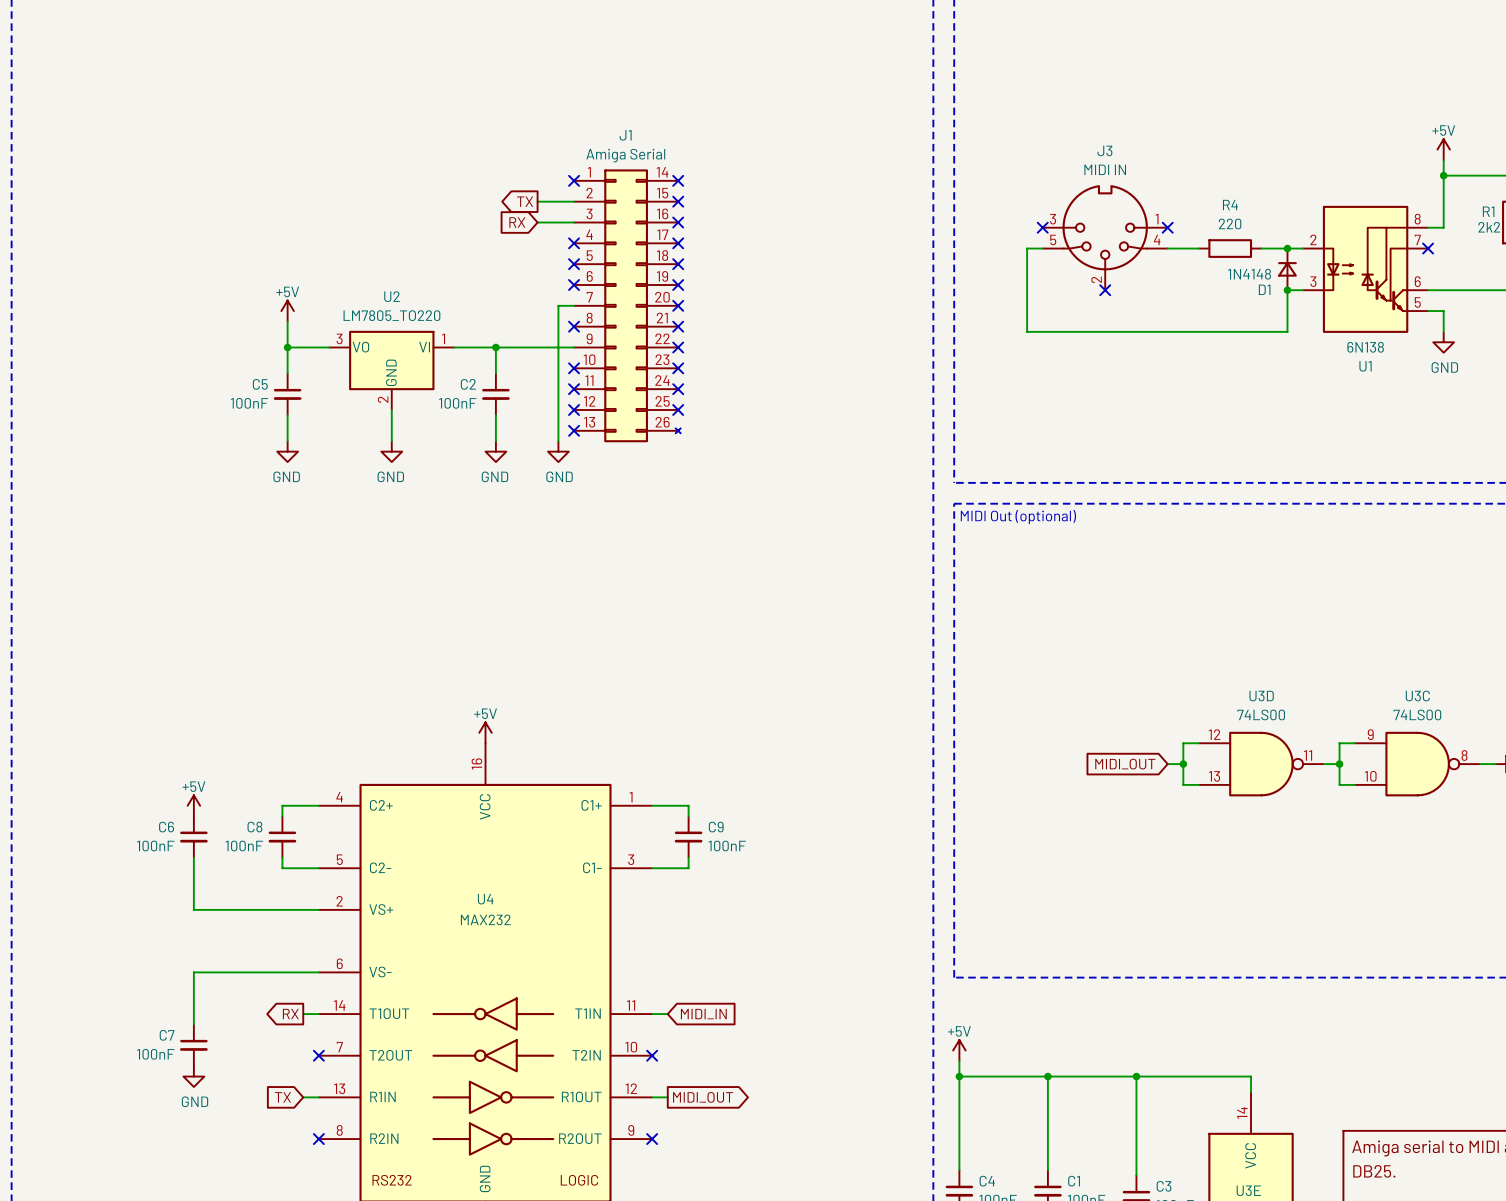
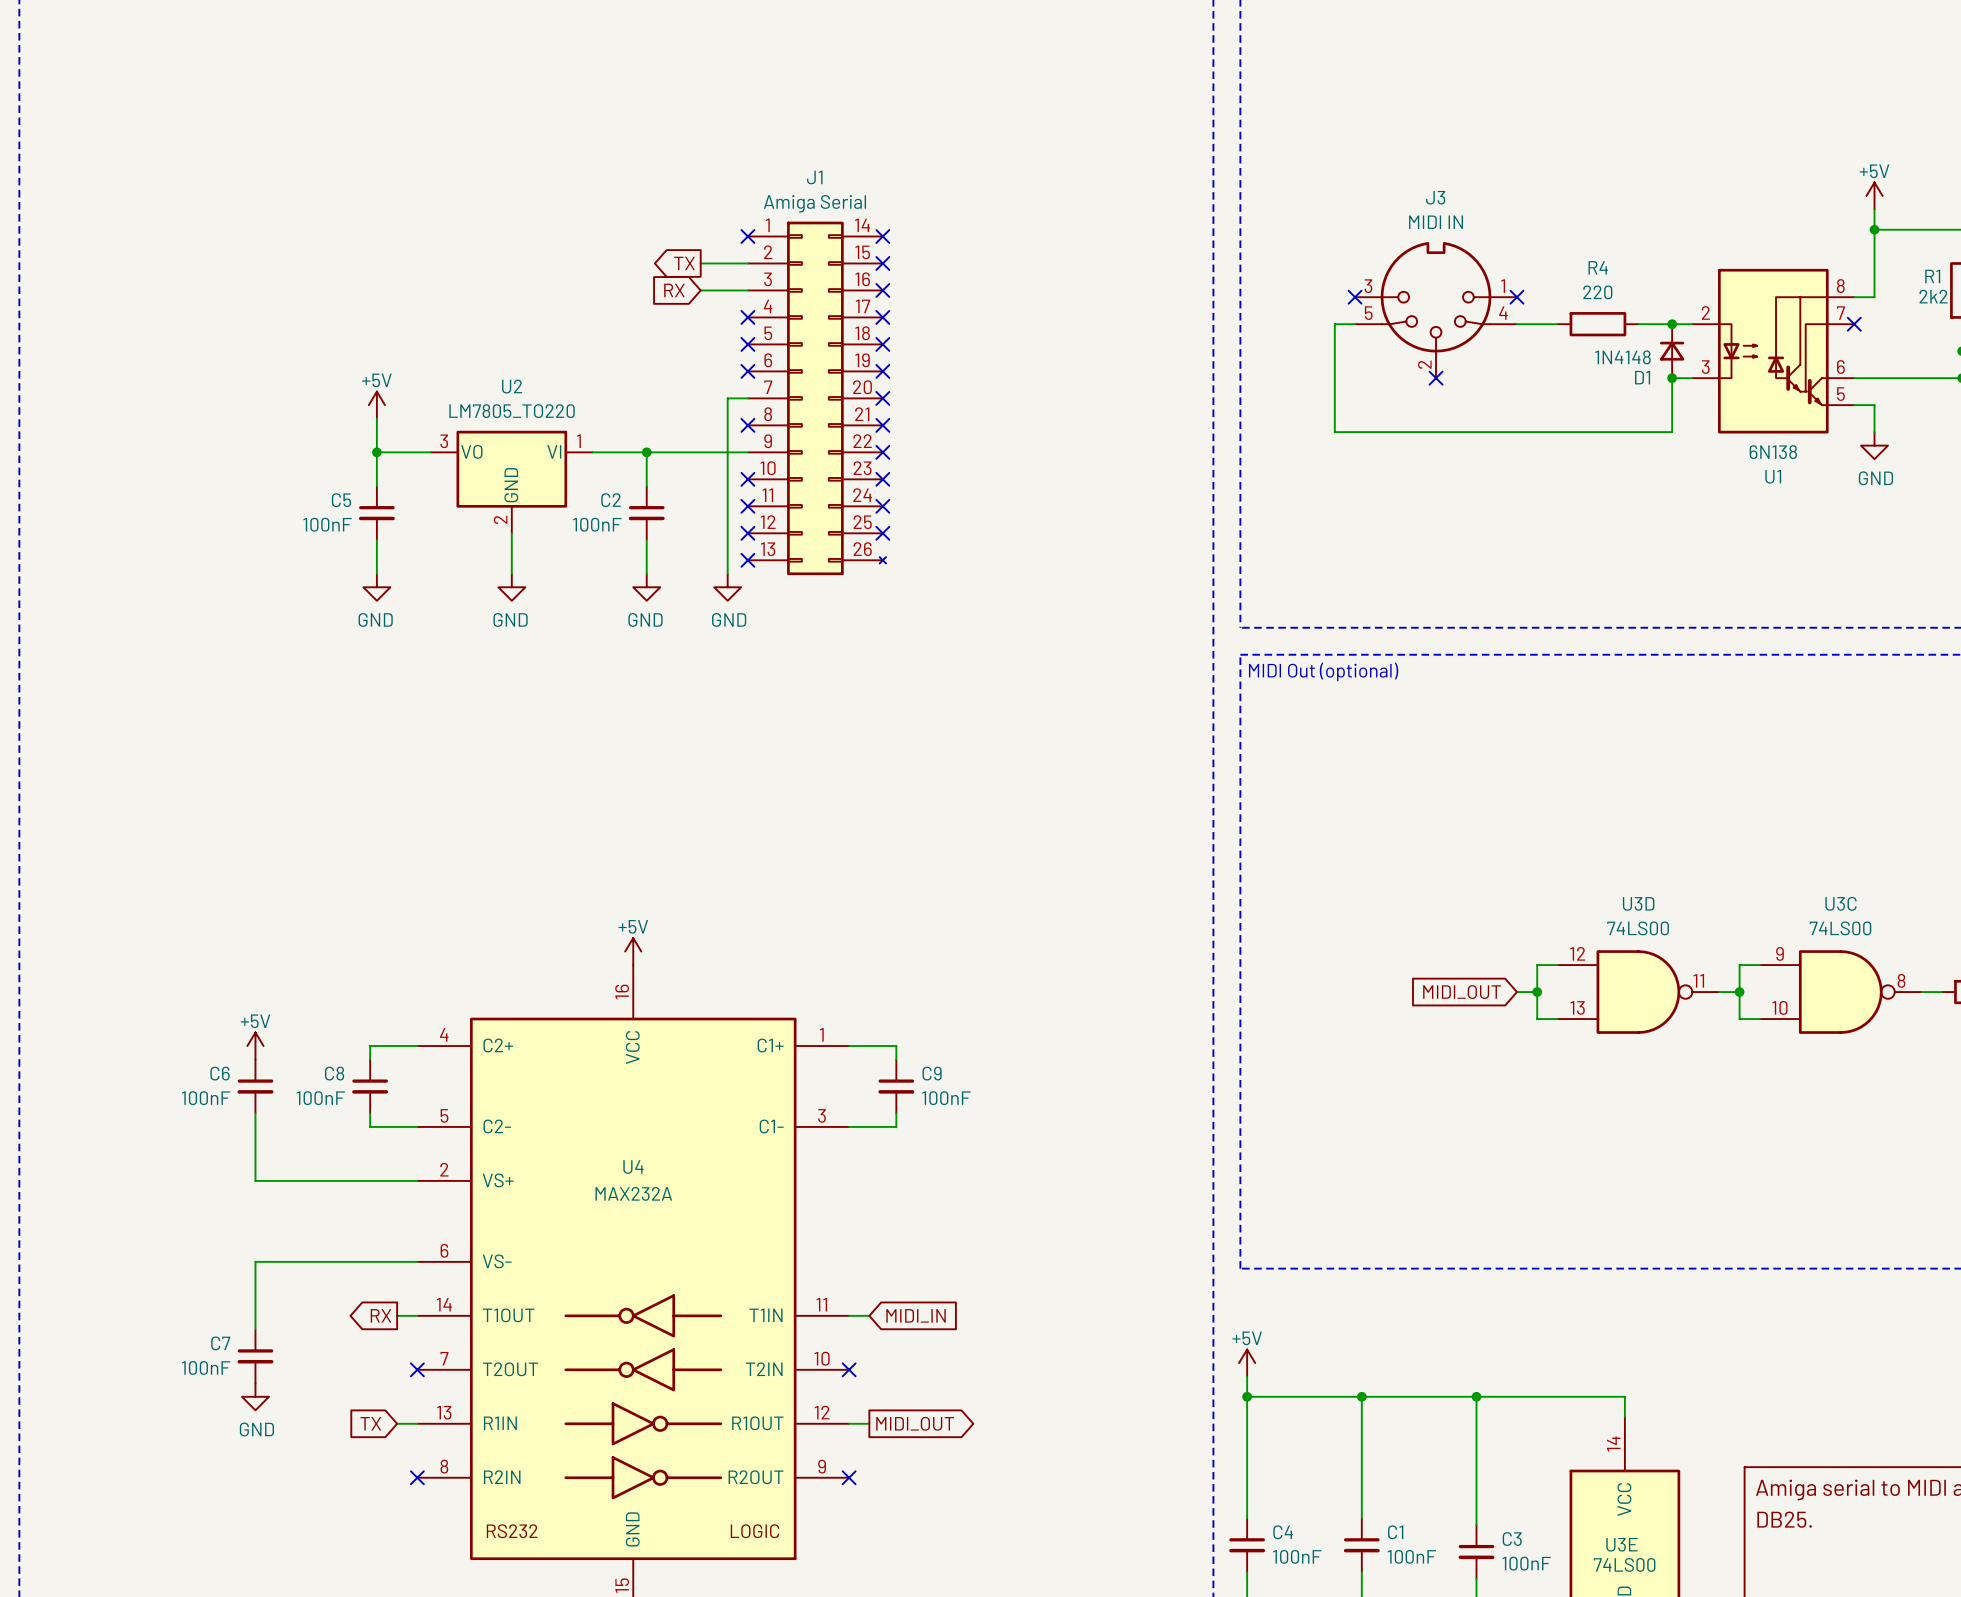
U4 value: MAX232 (485, 919) -> MAX232A (633, 1193)

